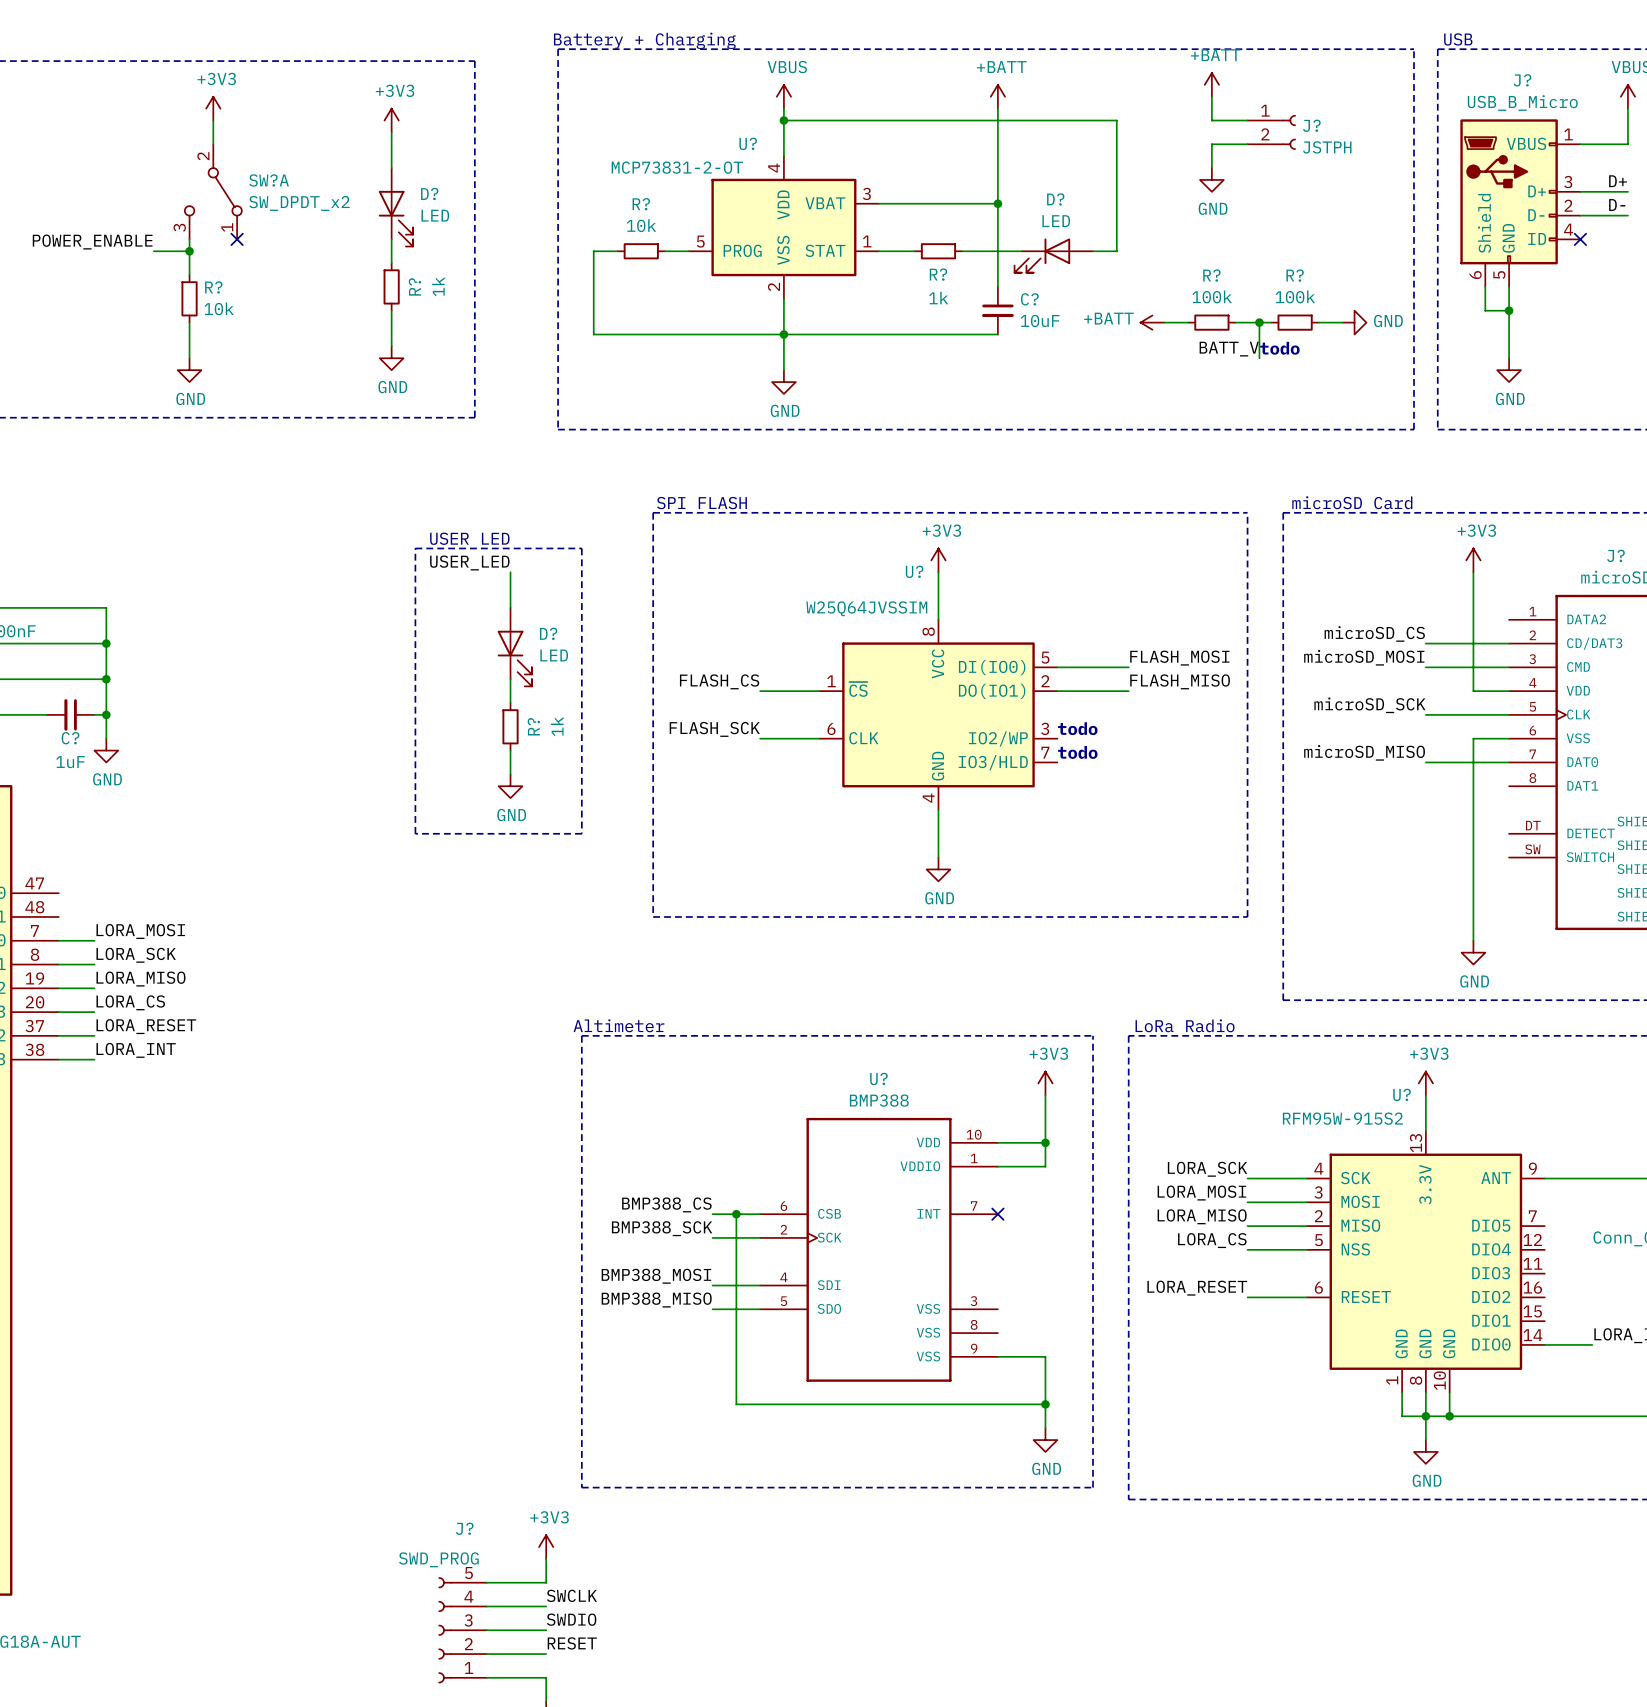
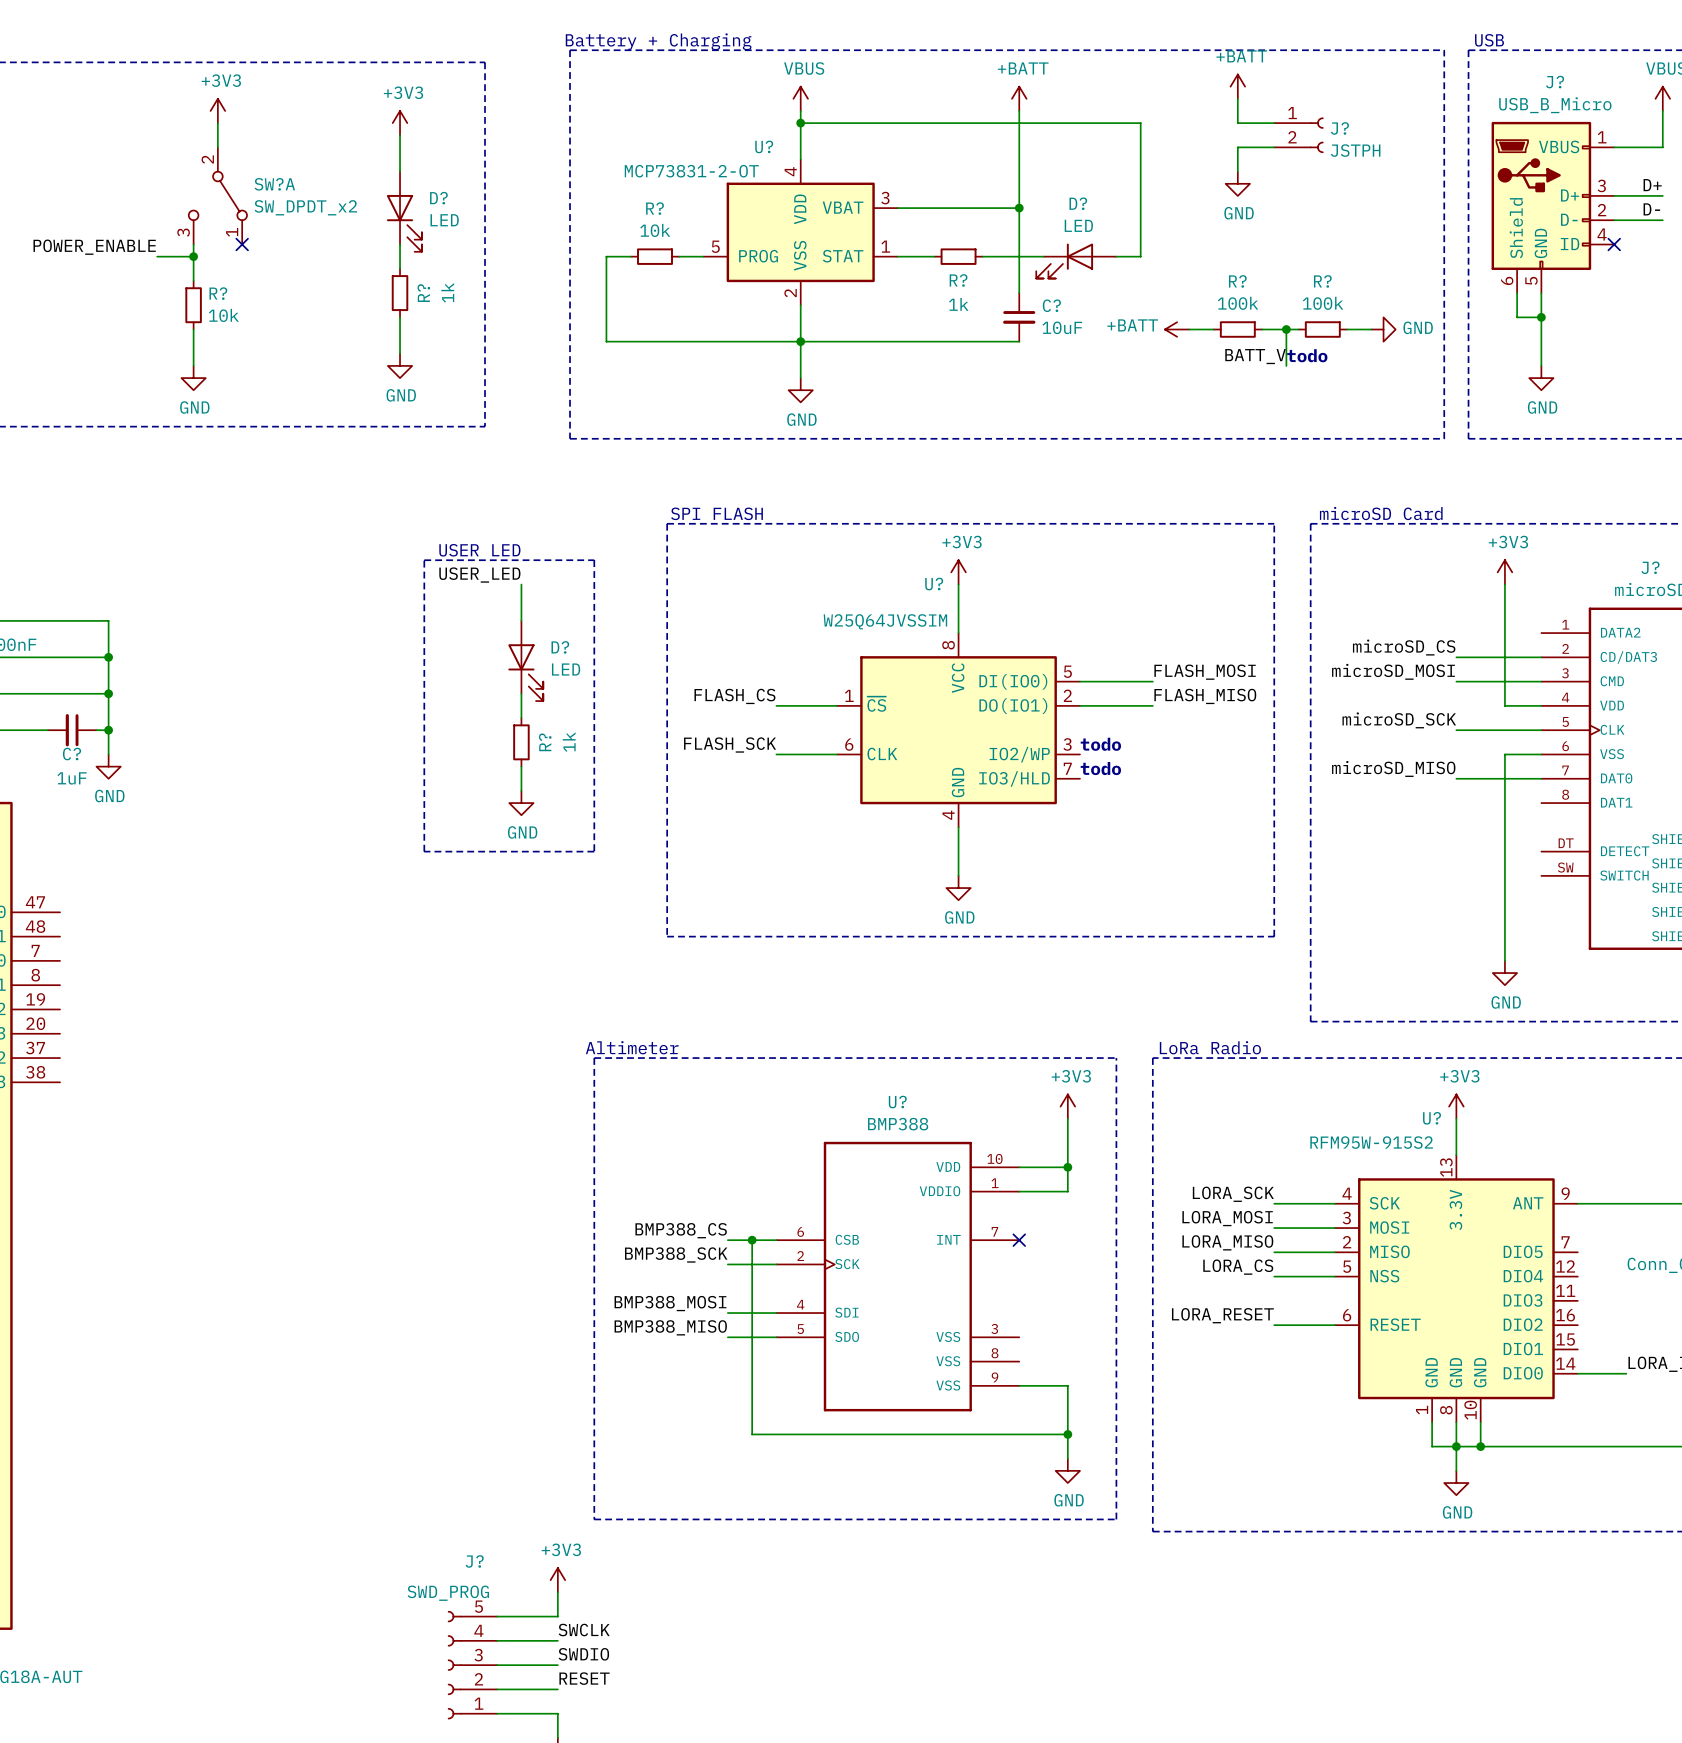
label: LORA_MOSI (140, 931) -> none
wire: (58, 940) (94, 940) -> none
label: LORA_SCK (136, 955) -> none
wire: (58, 964) (94, 964) -> none
label: LORA_MISO (140, 979) -> none
wire: (58, 988) (94, 988) -> none
label: LORA_CS (130, 1002) -> none
wire: (58, 1012) (94, 1012) -> none
label: LORA_RESET (146, 1026) -> none
wire: (58, 1035) (94, 1035) -> none
label: LORA_INT (136, 1050) -> none
wire: (58, 1059) (94, 1059) -> none

